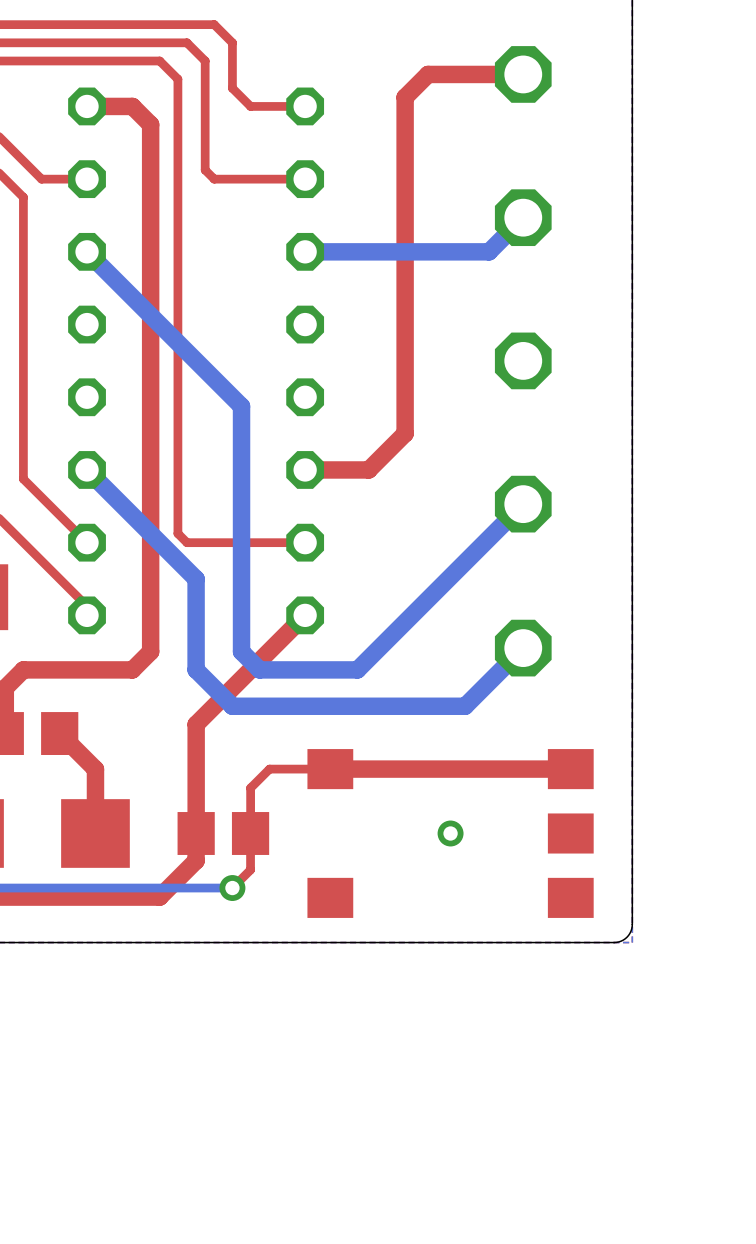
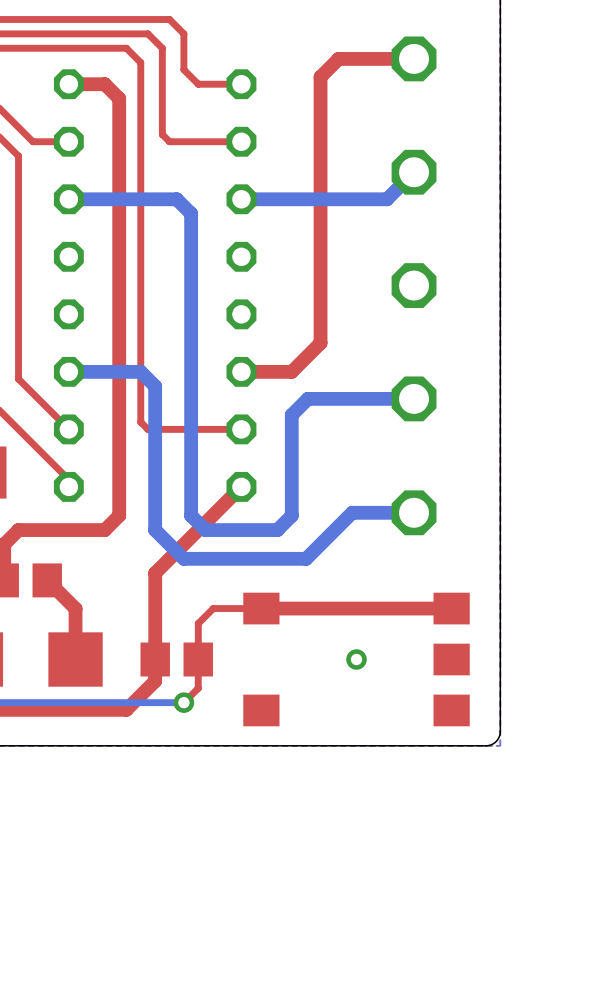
bottom track: (87, 251) (241, 406) -> (68, 199) (176, 199) (191, 213) (191, 321)
bottom track: (87, 469) (196, 579) -> (68, 371) (140, 371) (155, 386) (155, 458)
bottom track: (523, 504) (357, 669) (350, 669) -> (414, 398) (307, 398) (291, 415) (291, 515) (277, 530)
bottom track: (523, 648) (465, 706) (386, 706) -> (414, 512) (352, 512) (306, 558)

